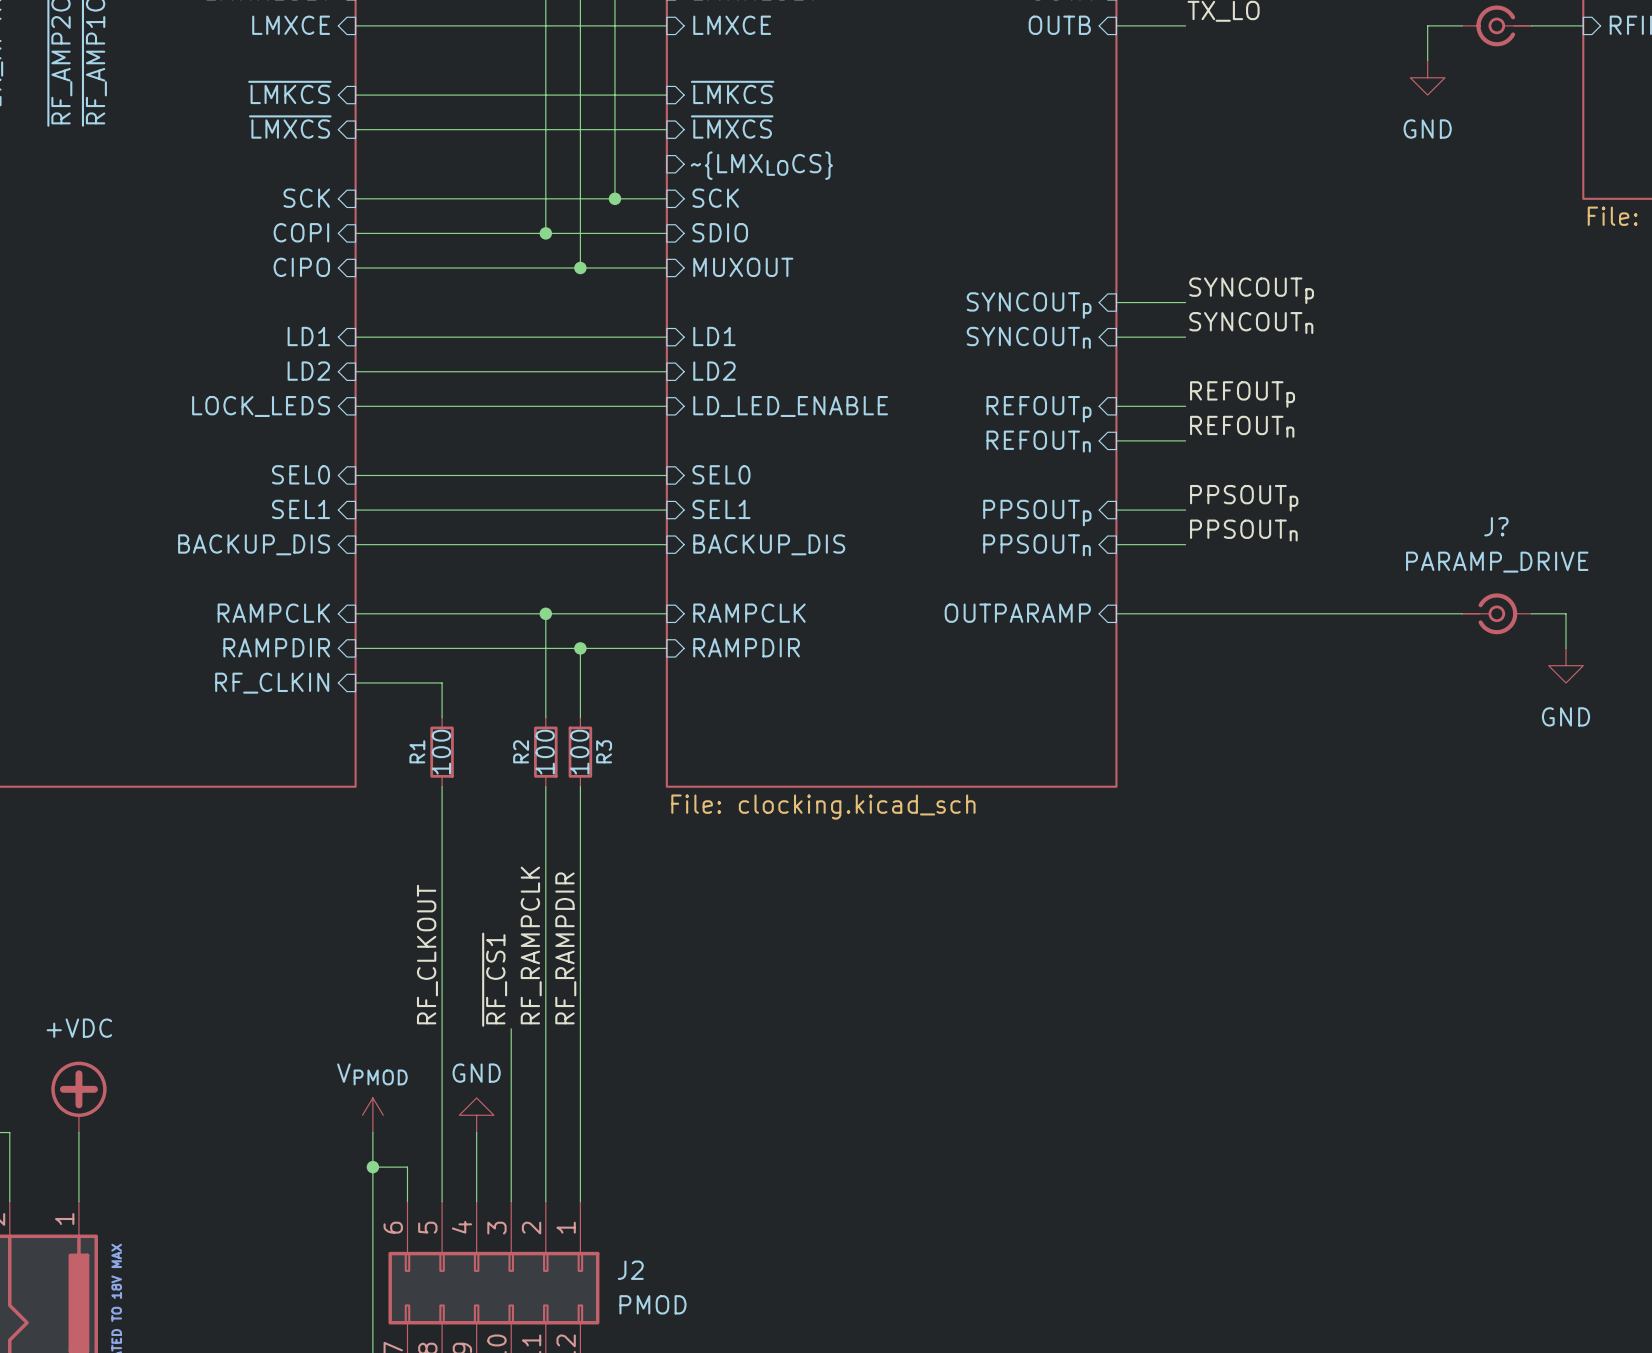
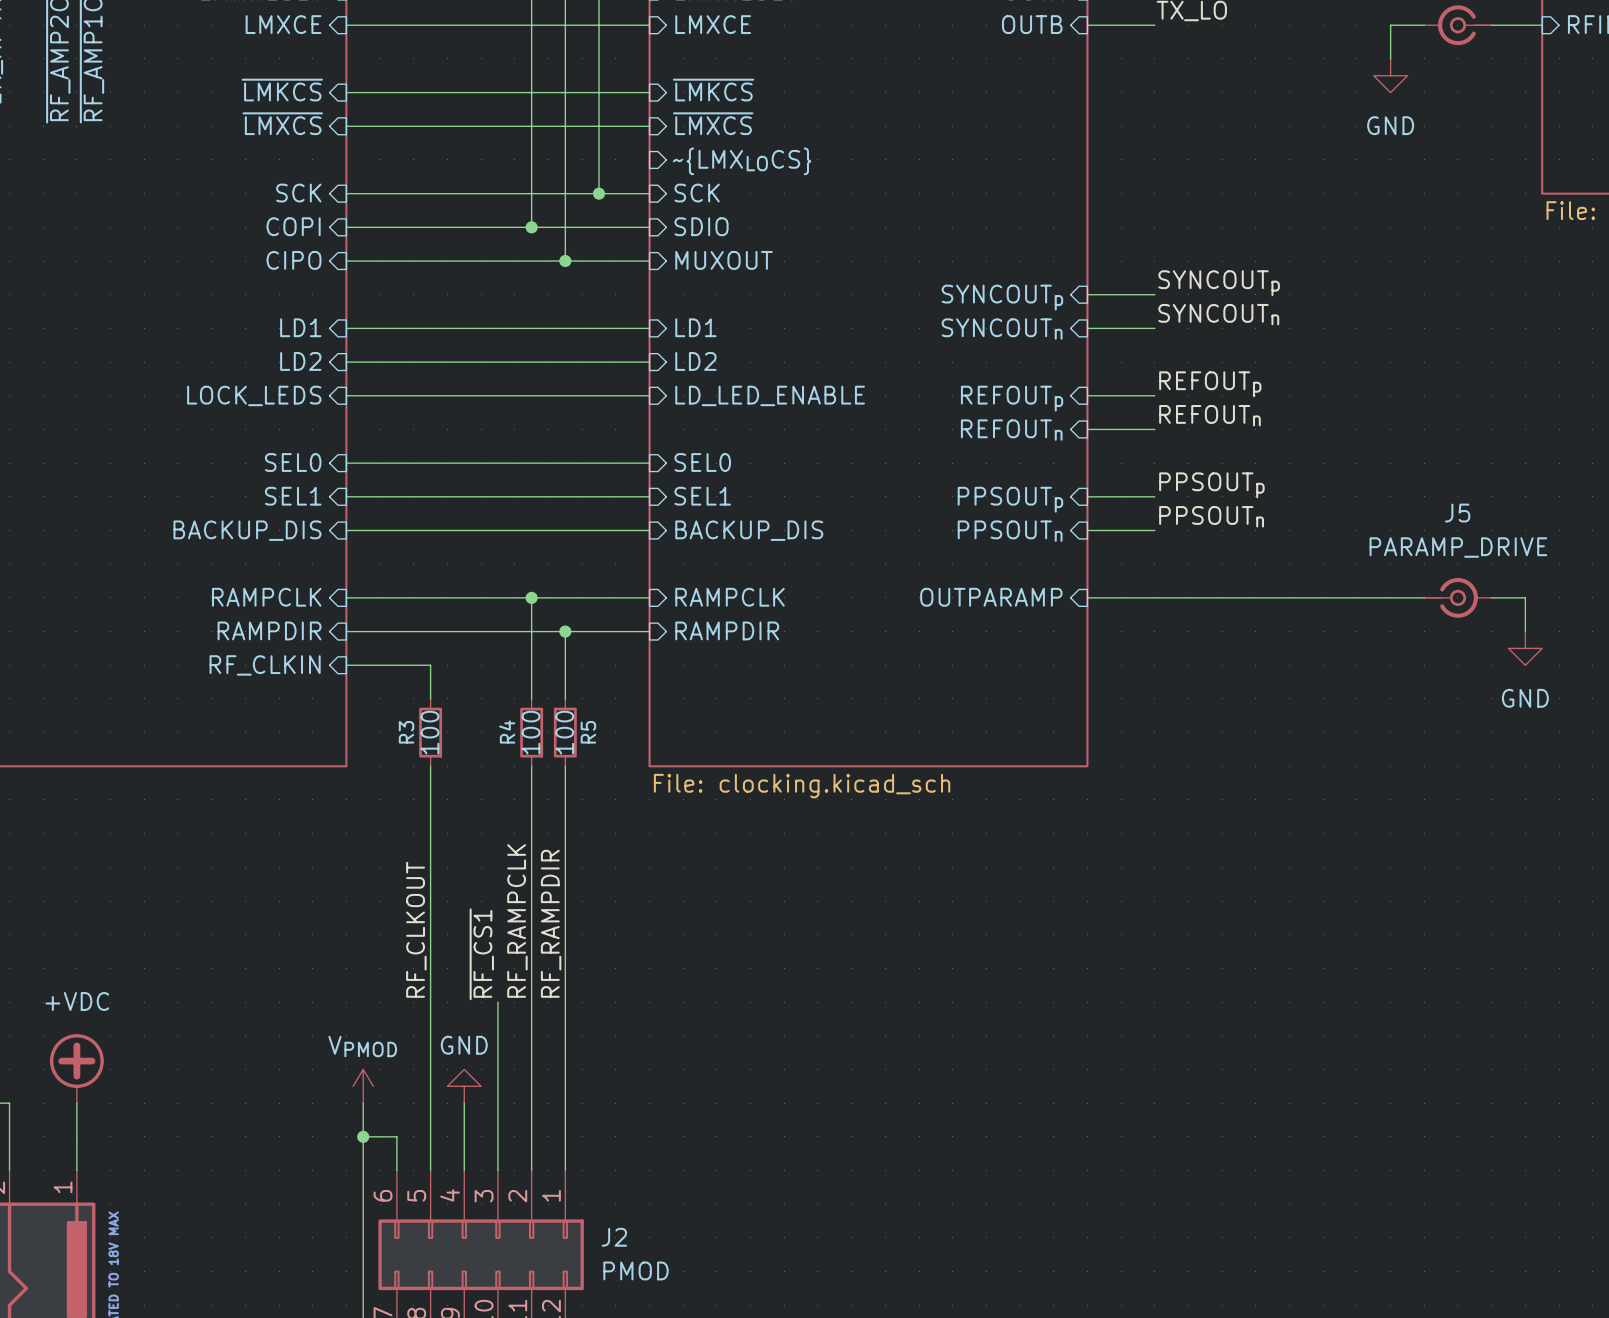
J? name: J? (1496, 526) -> J5 (1457, 513)
R1 name: R1 (417, 751) -> R3 (406, 732)
R2 name: R2 (521, 751) -> R4 (507, 731)
R3 name: R3 (604, 751) -> R5 (588, 732)

